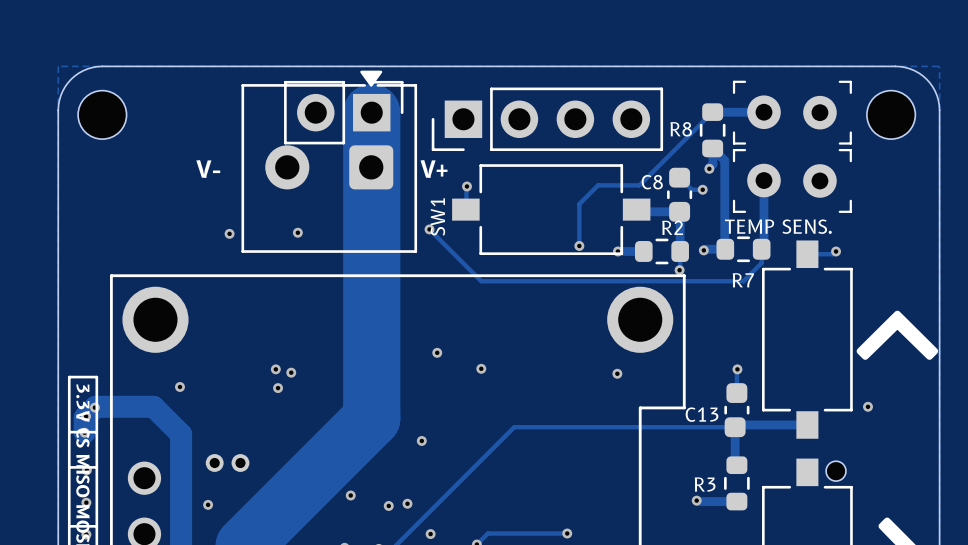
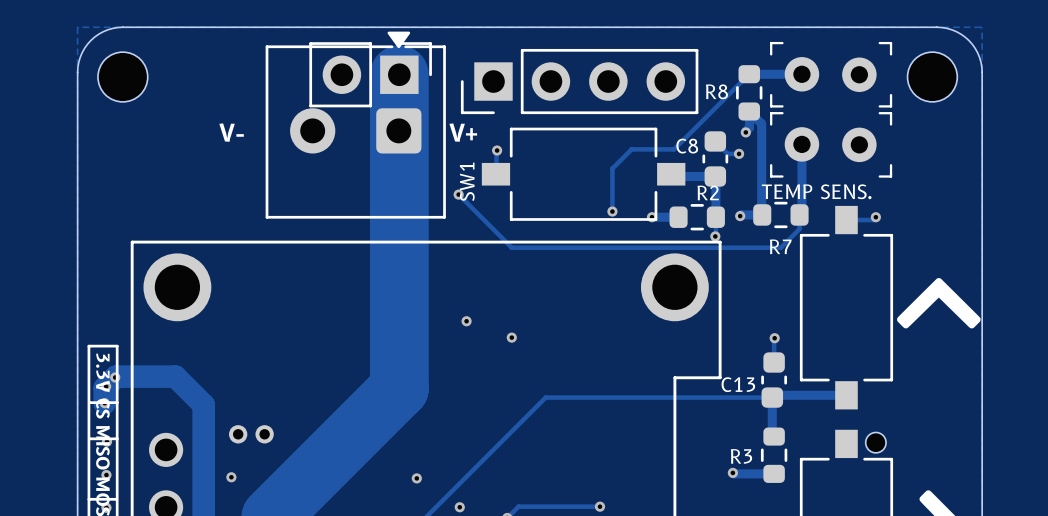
via: (297, 232) -> none
via: (229, 233) -> none
via: (275, 369) -> none
via: (291, 372) -> none
via: (617, 373) -> none
via: (179, 386) -> none
via: (278, 388) -> none
via: (867, 406) -> none
via: (421, 440) -> none
via: (350, 495) -> none
via: (407, 503) -> none

